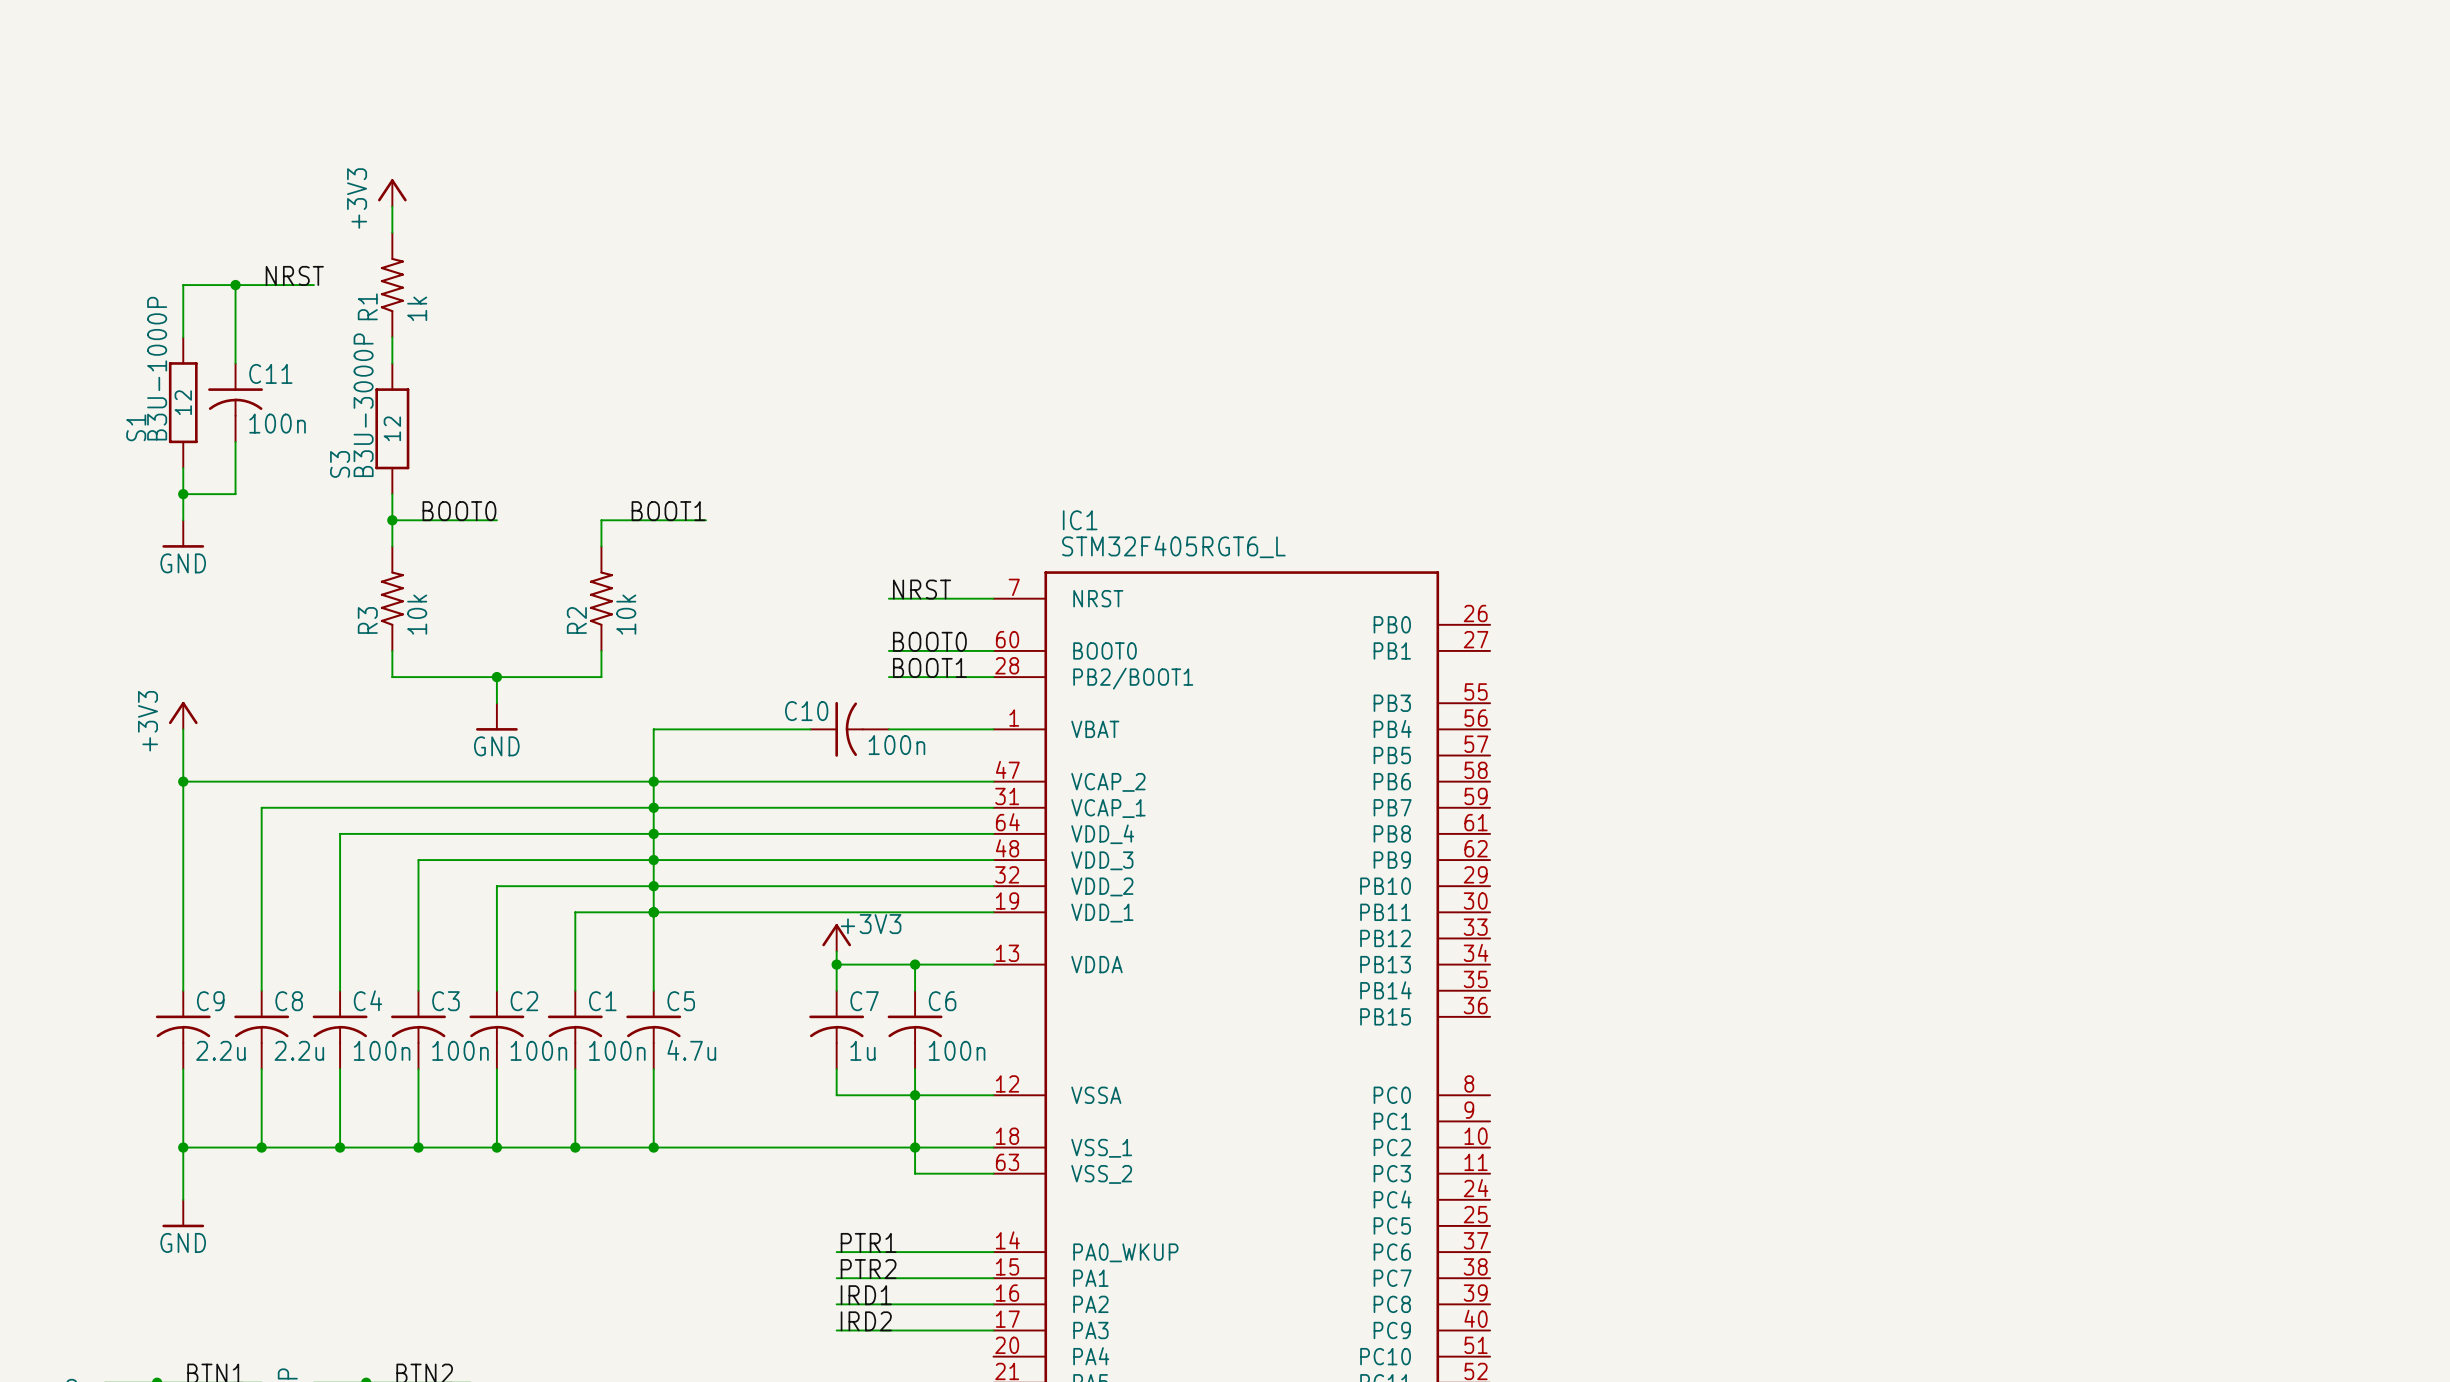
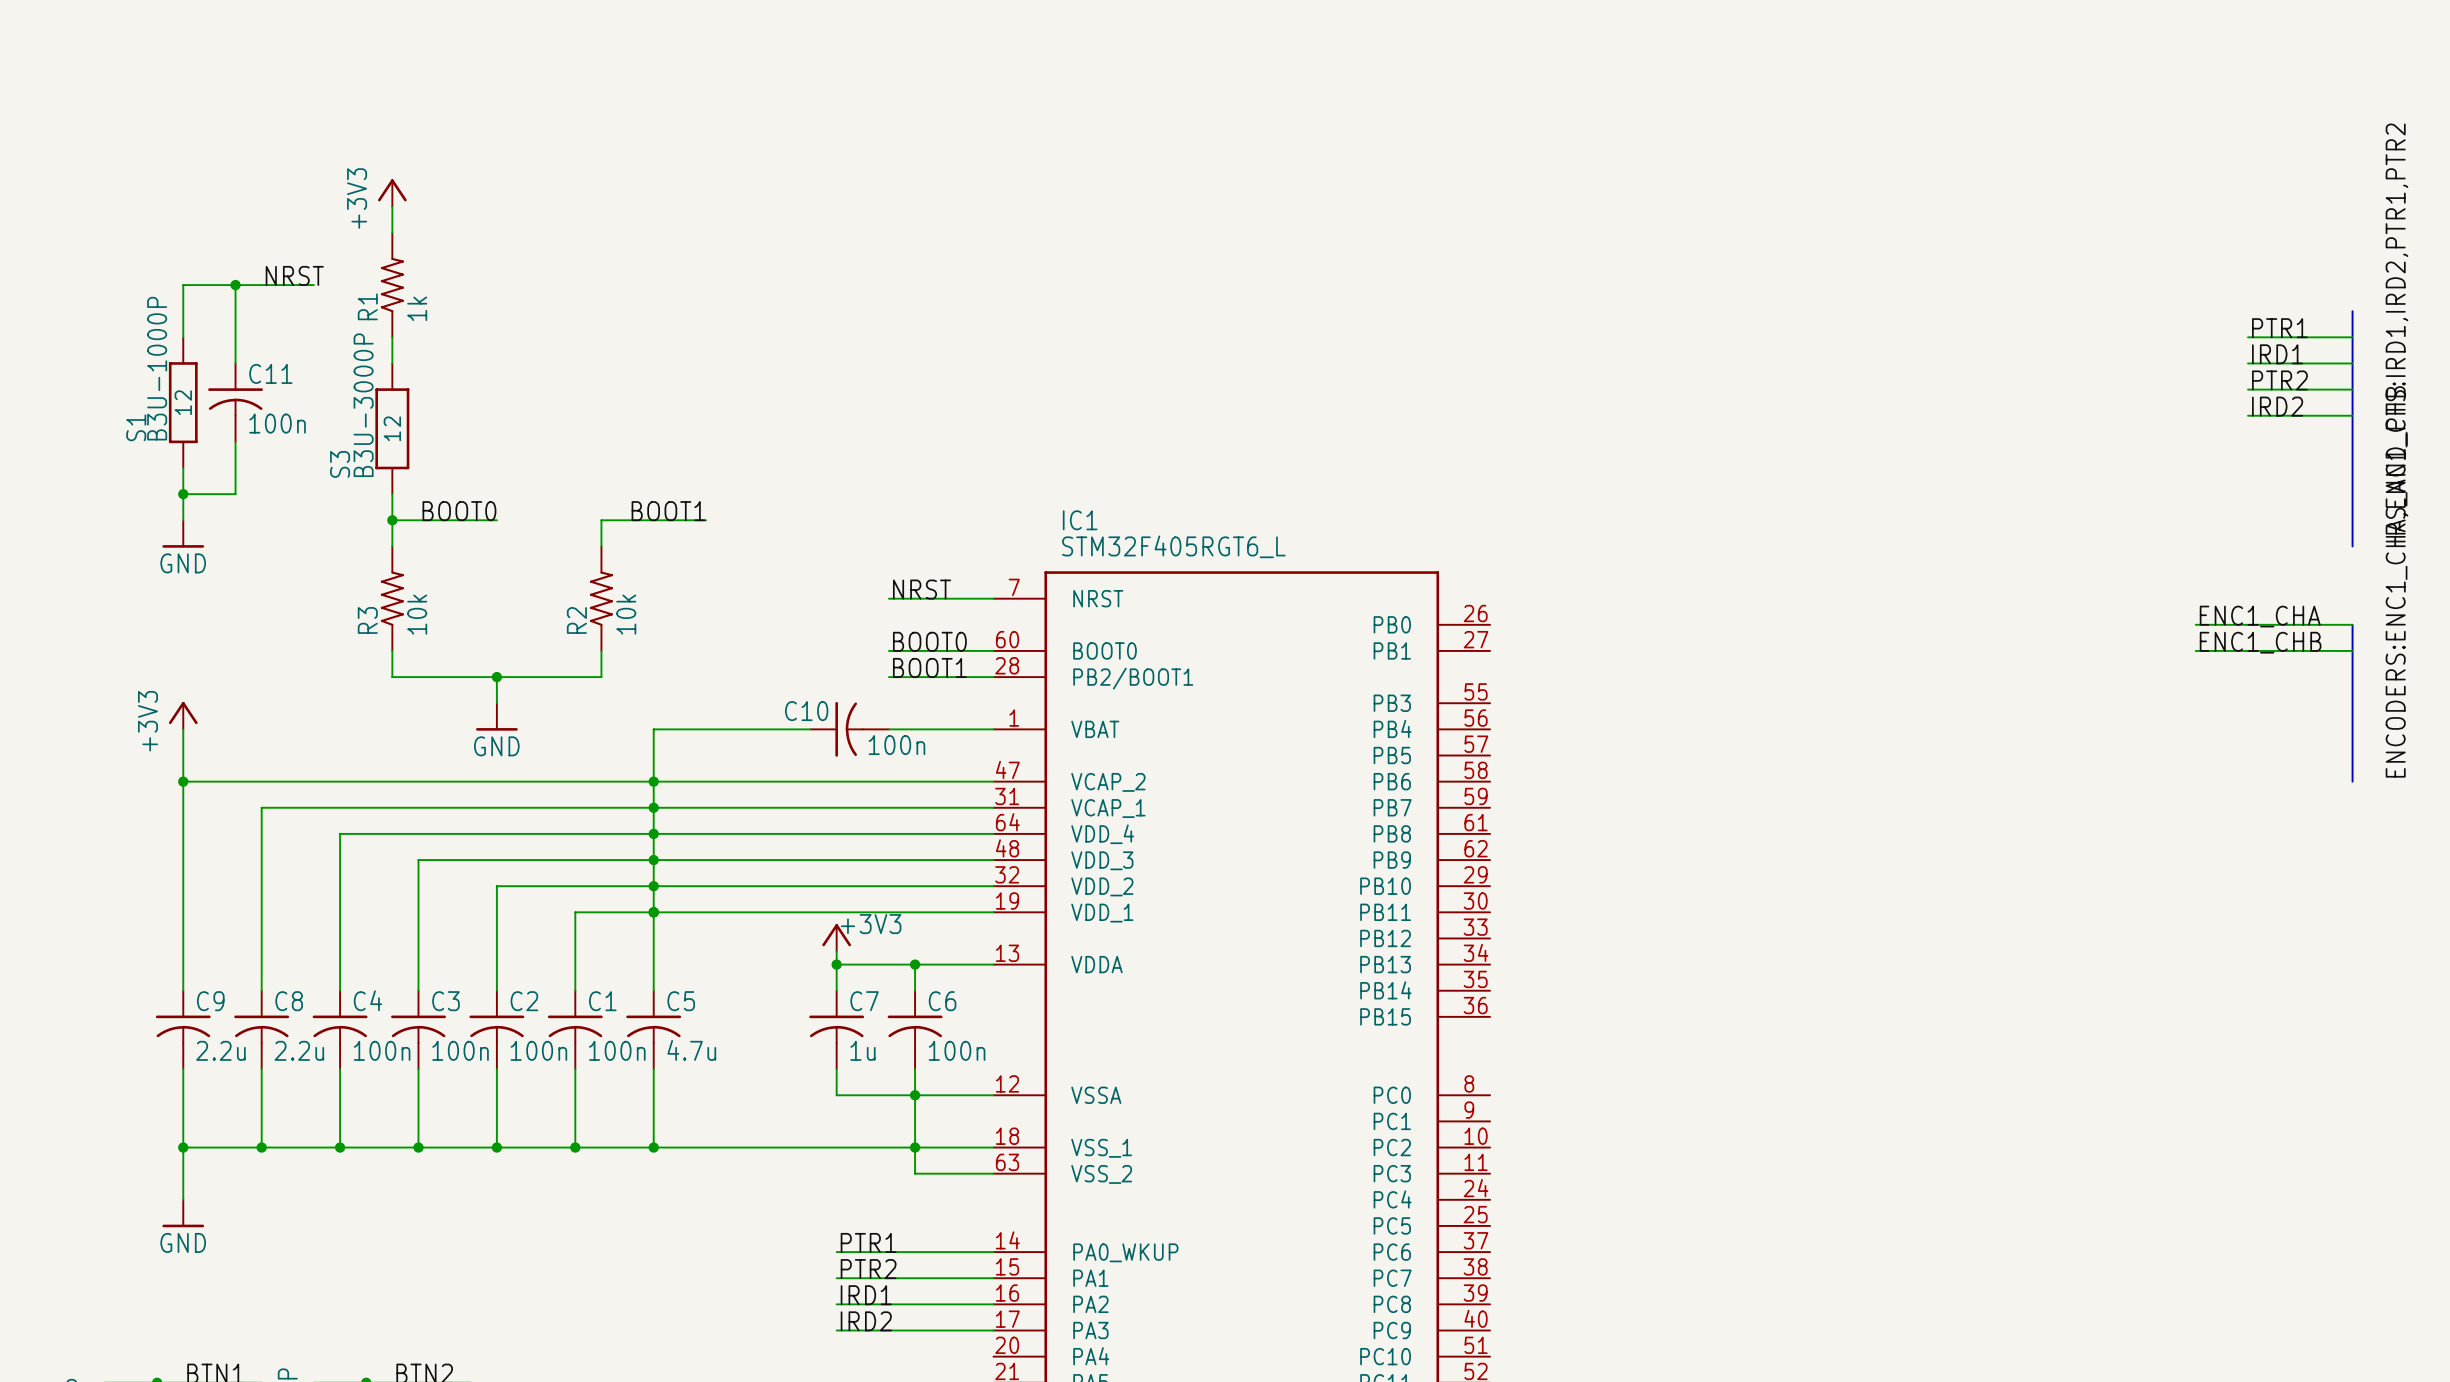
bus: none -> (2352, 311) (2352, 546)
label: none -> PTR1 (2279, 328)
label: none -> IRS_AND_PTS:IRD1,IRD2,PTR1,PTR2 (2396, 332)
wire: none -> (2248, 337) (2352, 337)
label: none -> IRD1 (2277, 354)
wire: none -> (2248, 363) (2352, 363)
label: none -> PTR2 (2279, 380)
wire: none -> (2248, 389) (2352, 389)
label: none -> IRD2 (2277, 406)
wire: none -> (2248, 415) (2352, 415)
label: none -> ENCODERS:ENC1_CHA,ENC1_CHB (2396, 581)
label: none -> ENC1_CHA (2260, 616)
wire: none -> (2195, 624) (2352, 624)
bus: none -> (2352, 624) (2352, 781)
label: none -> ENC1_CHB (2260, 642)
wire: none -> (2195, 650) (2352, 650)

